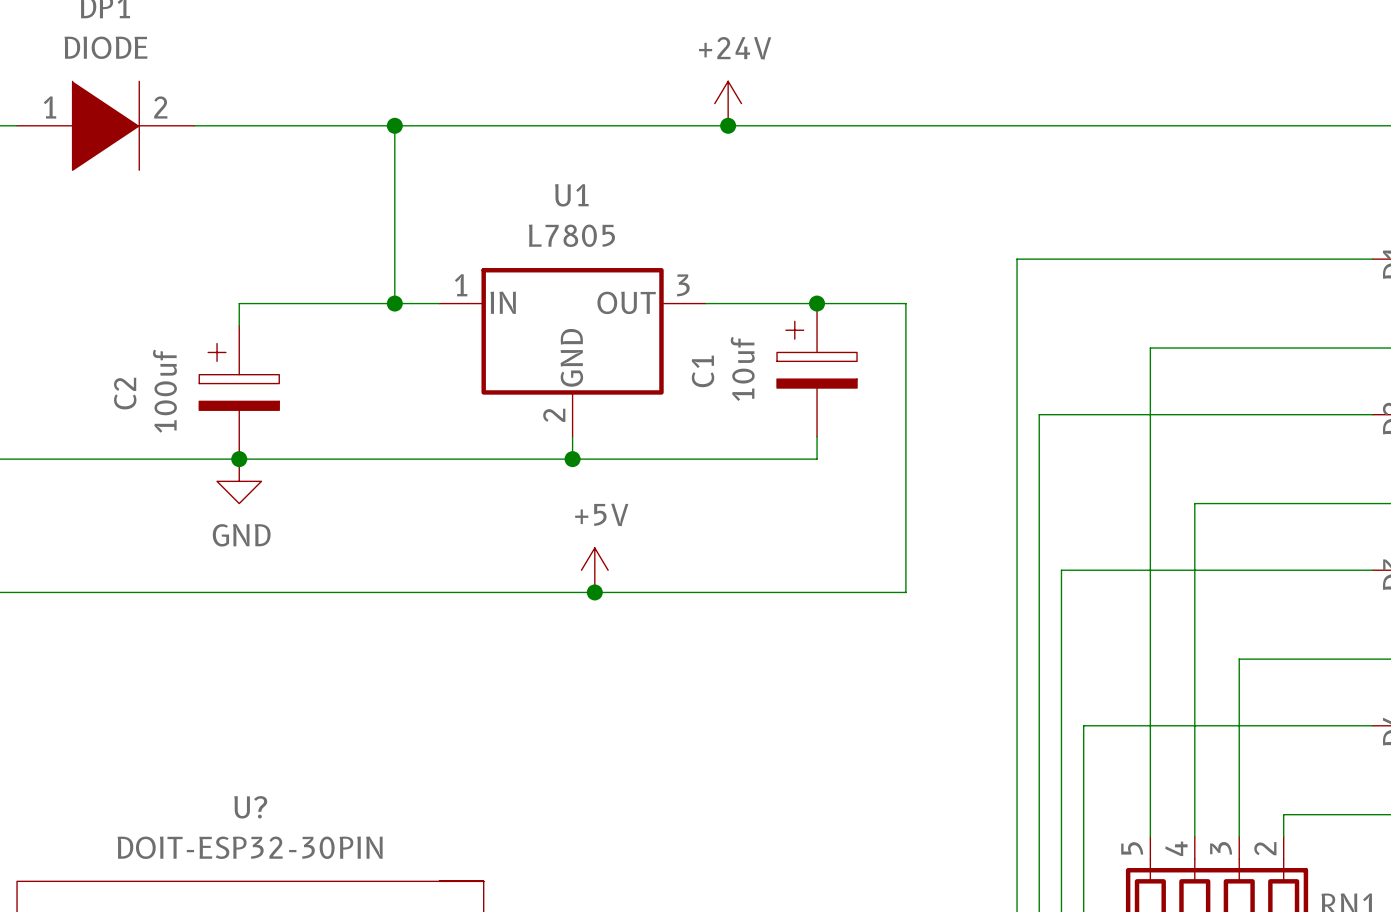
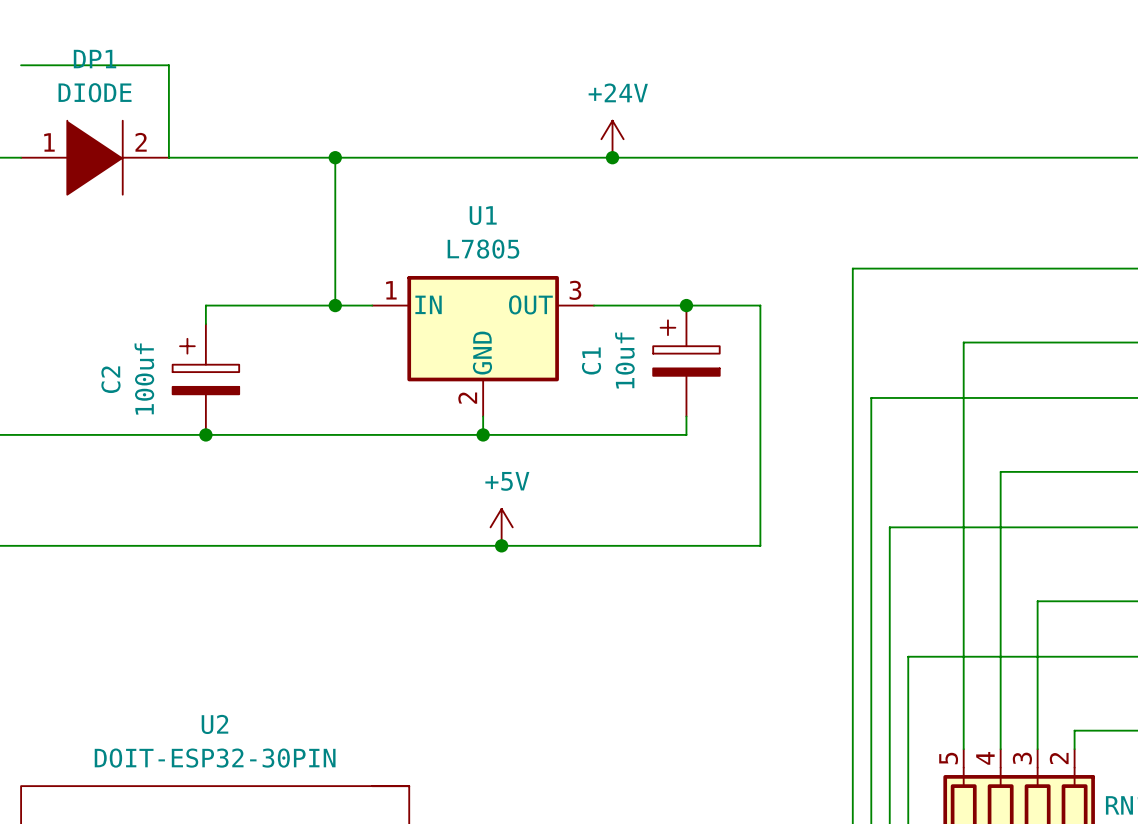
wire: none -> (21, 65) (168, 65) (168, 157)
power symbol: GND (239, 481) -> none
U? name: U? (250, 807) -> U2 (214, 724)

